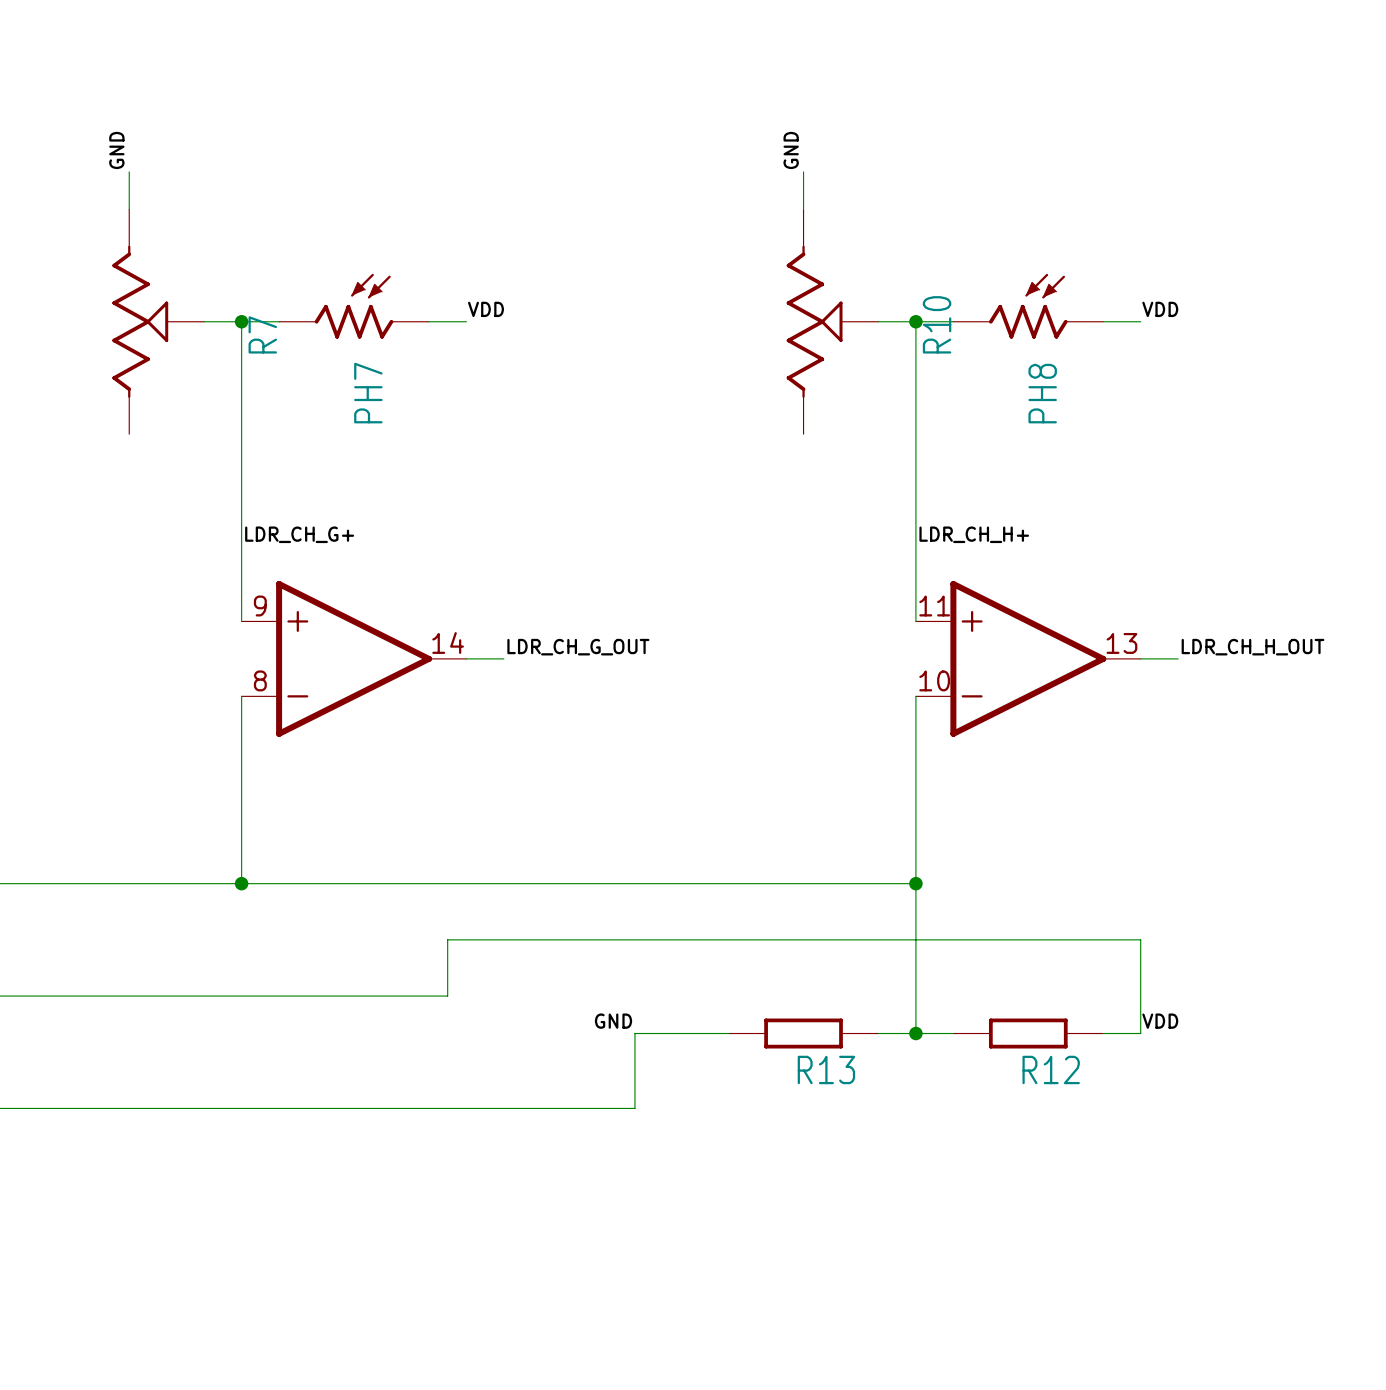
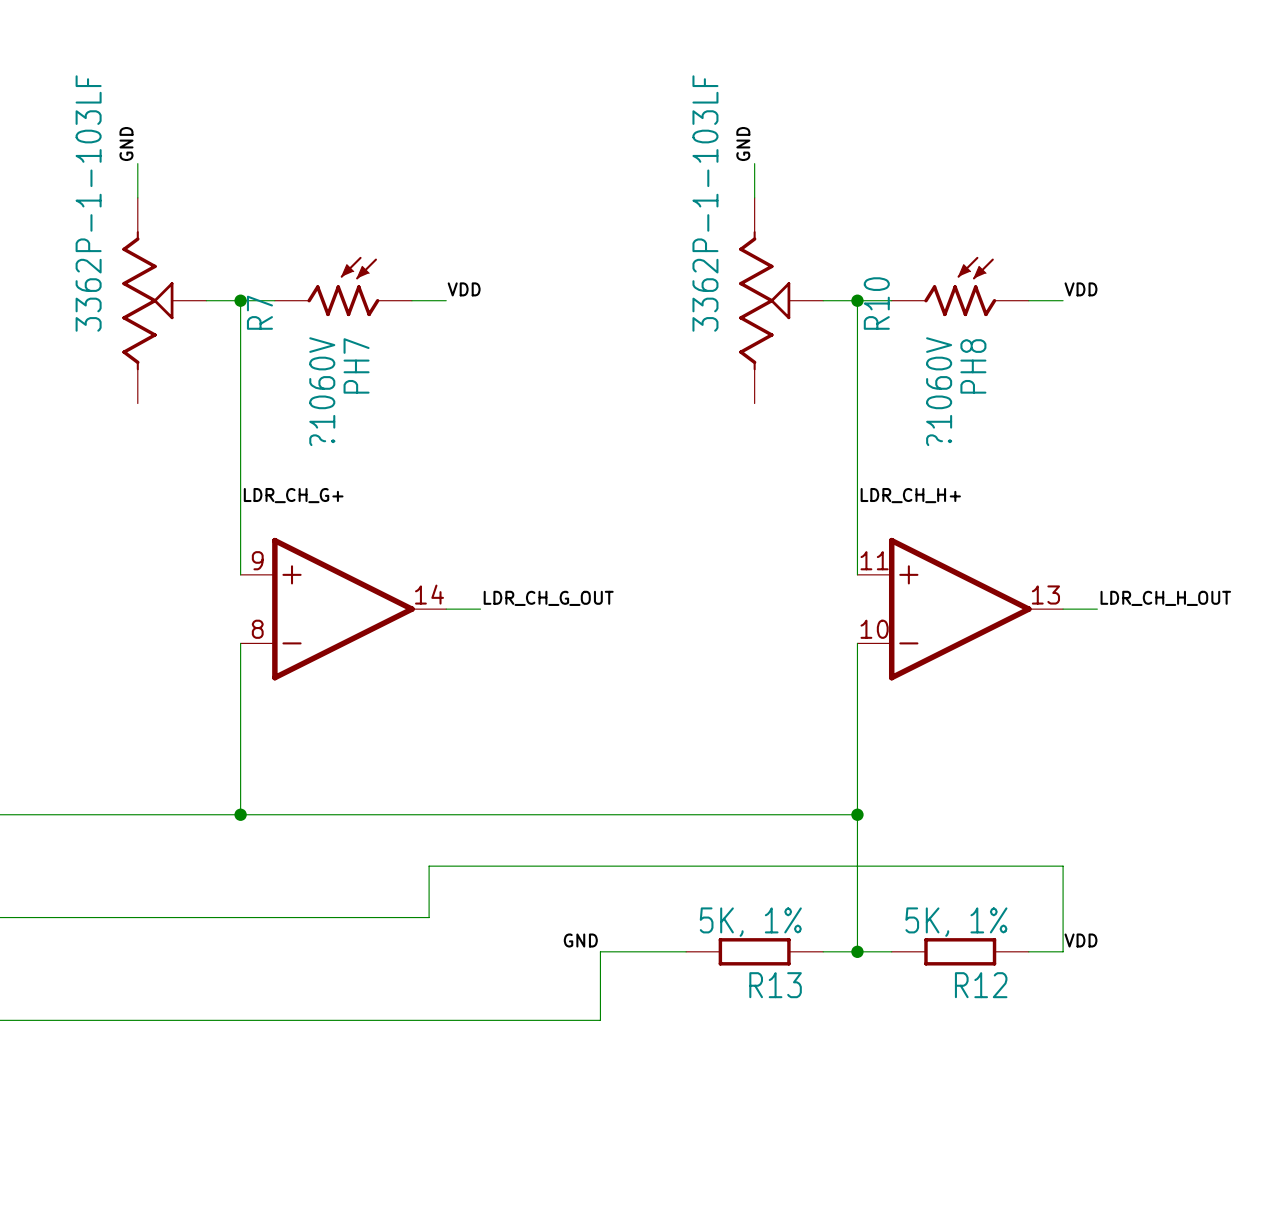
R7 value: none -> 3362P-1-103LF (88, 203)
R10 value: none -> 3362P-1-103LF (705, 203)
PH7 value: none -> ?1060V (322, 391)
PH8 value: none -> ?1060V (939, 391)
R13 value: none -> 5K, 1% (750, 922)
R12 value: none -> 5K, 1% (956, 922)

